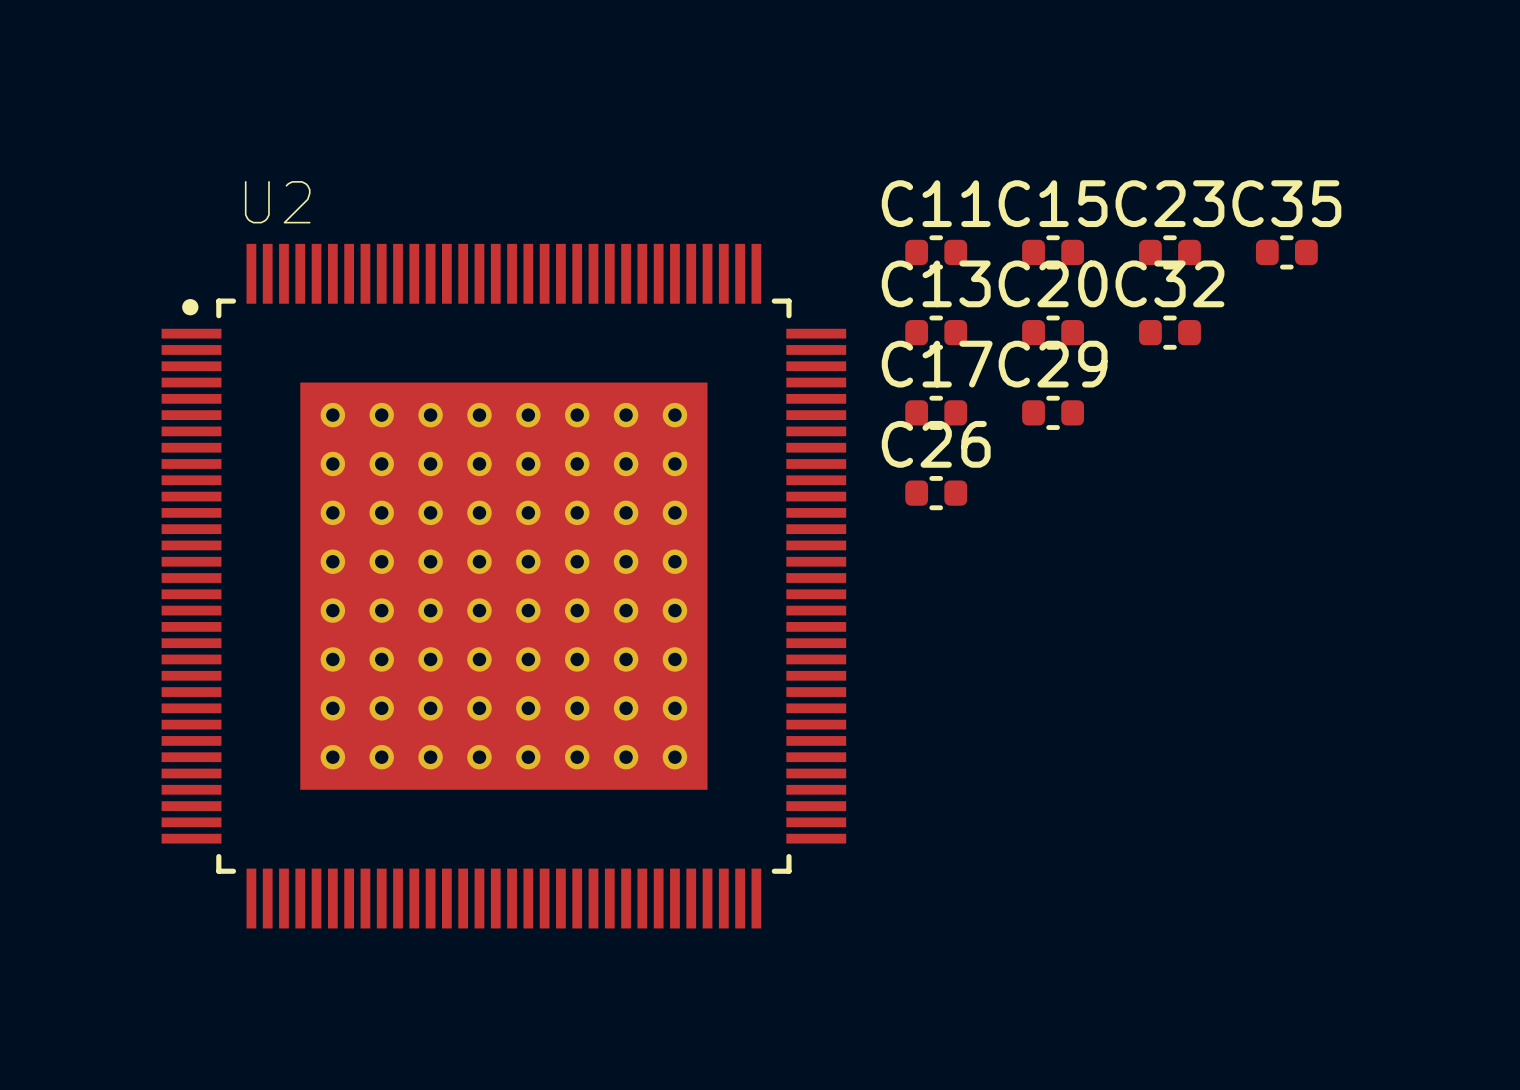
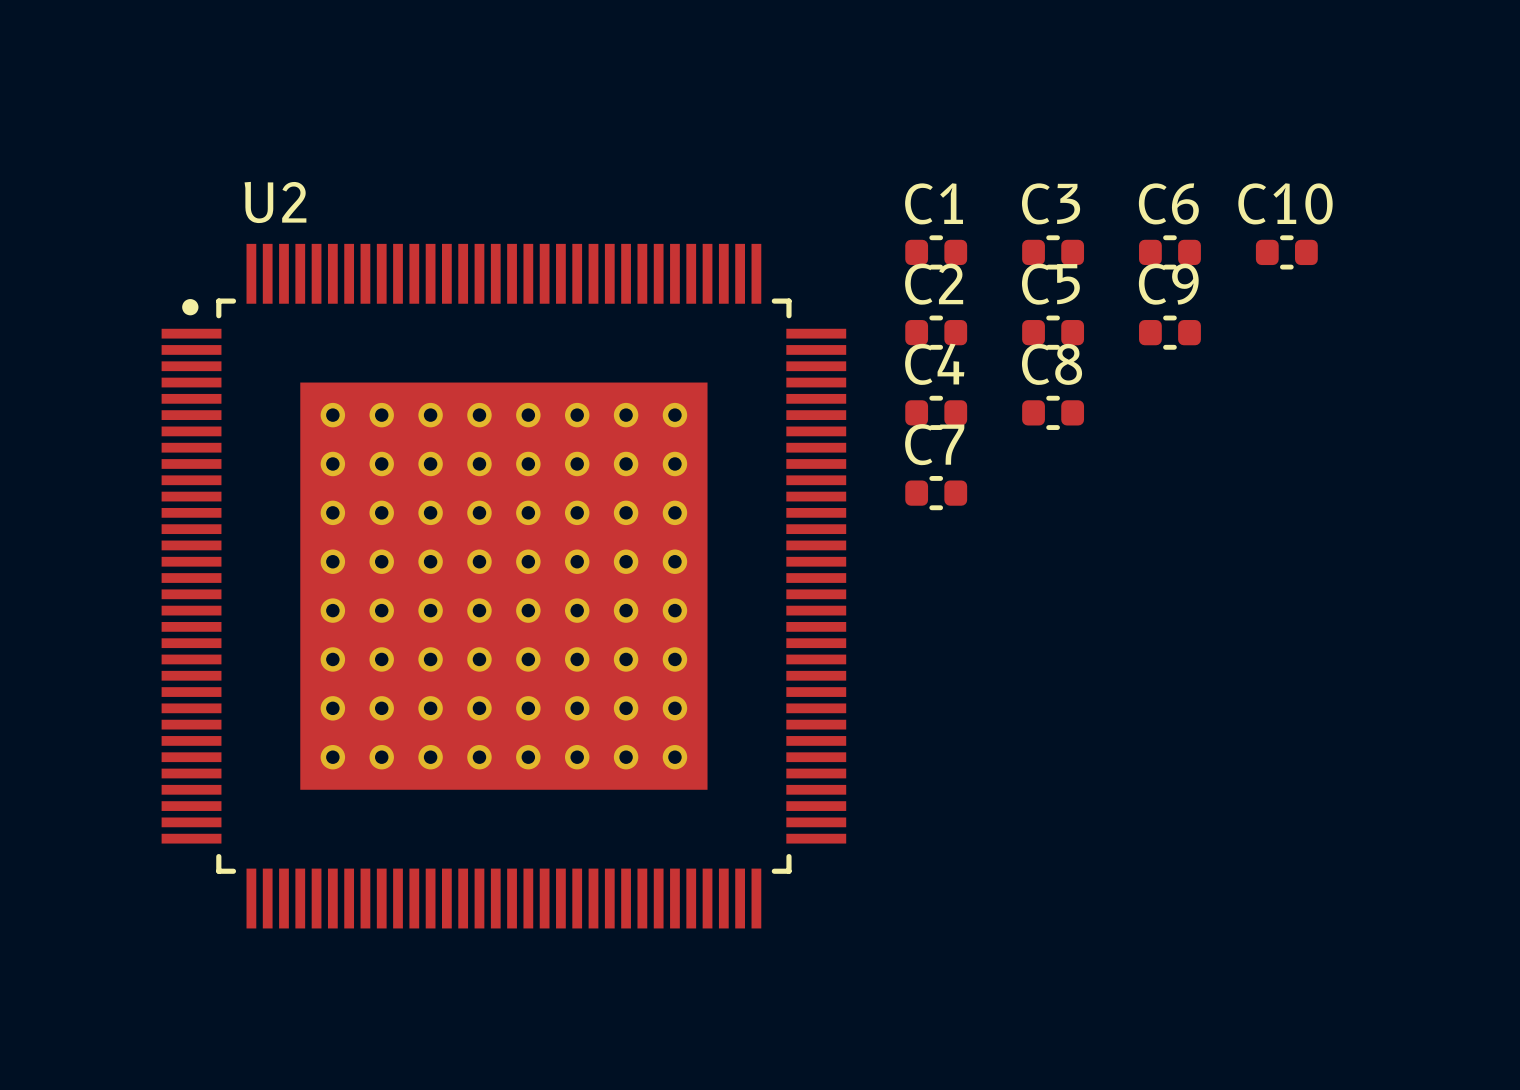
C11 name: C11 (936, 203) -> C1 (934, 203)
C15 name: C15 (1053, 203) -> C3 (1051, 203)
C23 name: C23 (1169, 203) -> C6 (1168, 203)
C35 name: C35 (1286, 203) -> C10 (1285, 203)
C13 name: C13 (936, 283) -> C2 (934, 284)
C20 name: C20 (1053, 283) -> C5 (1050, 284)
C32 name: C32 (1169, 283) -> C9 (1168, 284)
C17 name: C17 (937, 364) -> C4 (934, 364)
C29 name: C29 (1053, 364) -> C8 (1052, 364)
C26 name: C26 (936, 444) -> C7 (934, 444)

